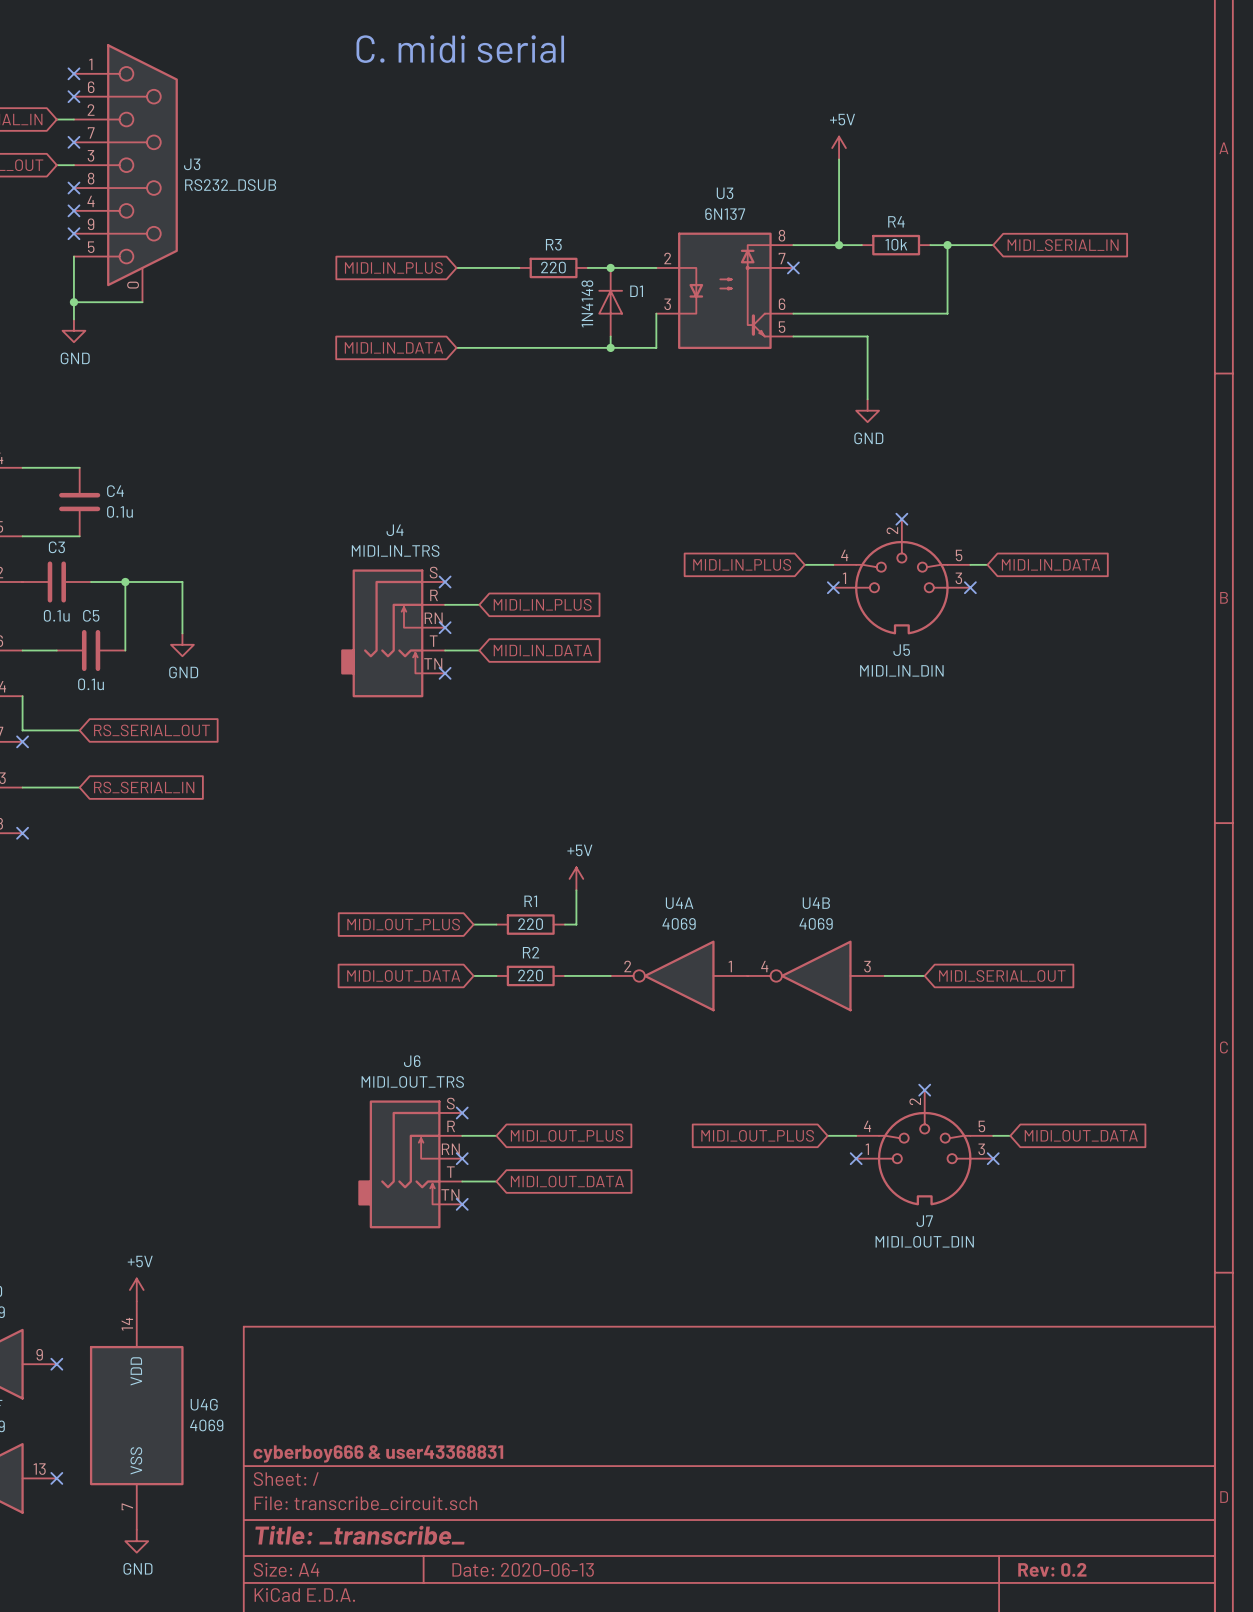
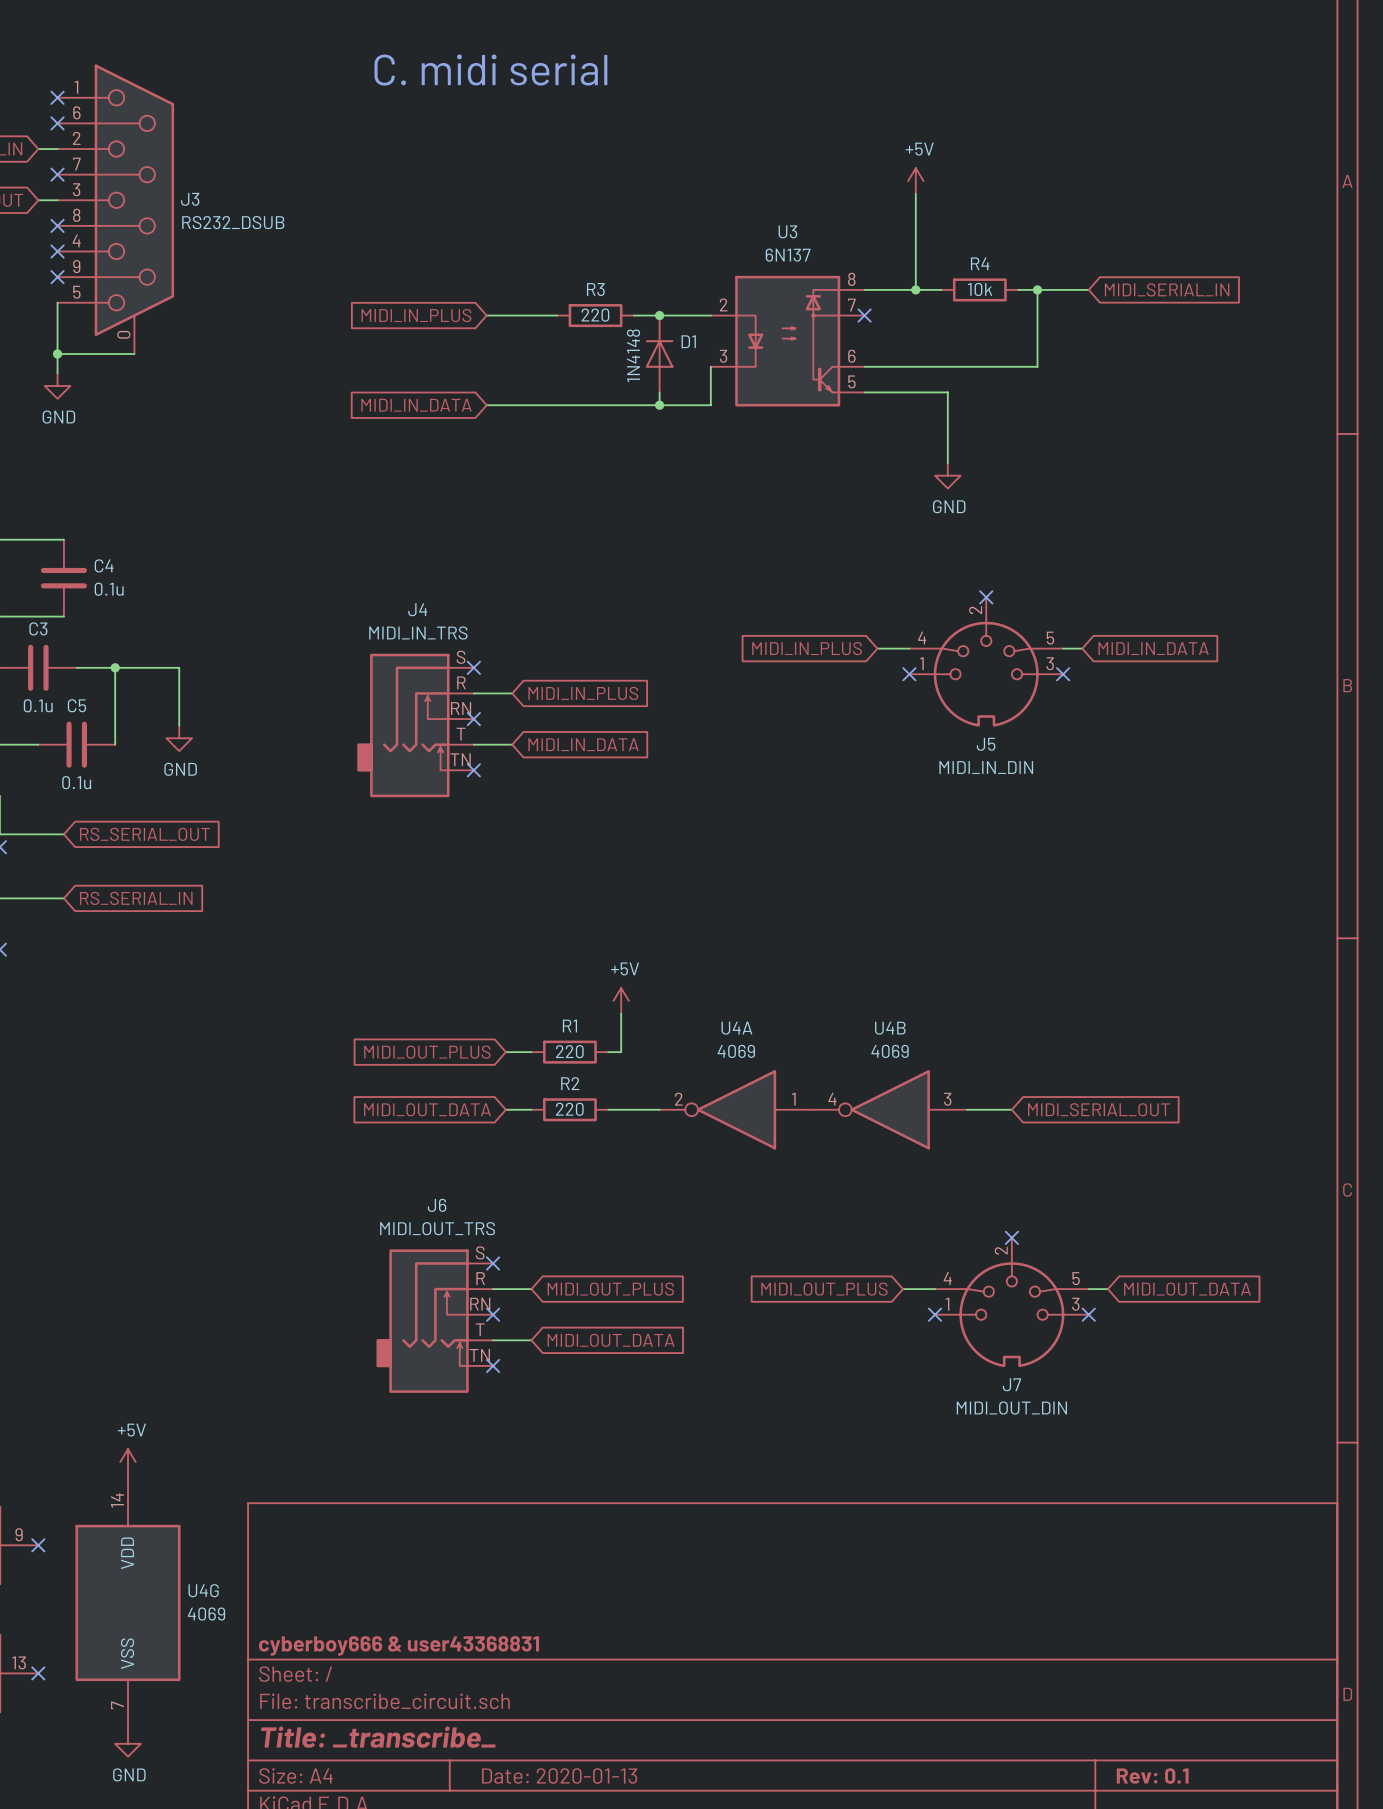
title block: Date: 2020-06-13 (523, 1569) -> Date: 2020-01-13 (559, 1776)
title block: Rev: 0.2 (1052, 1569) -> Rev: 0.1 (1152, 1776)

